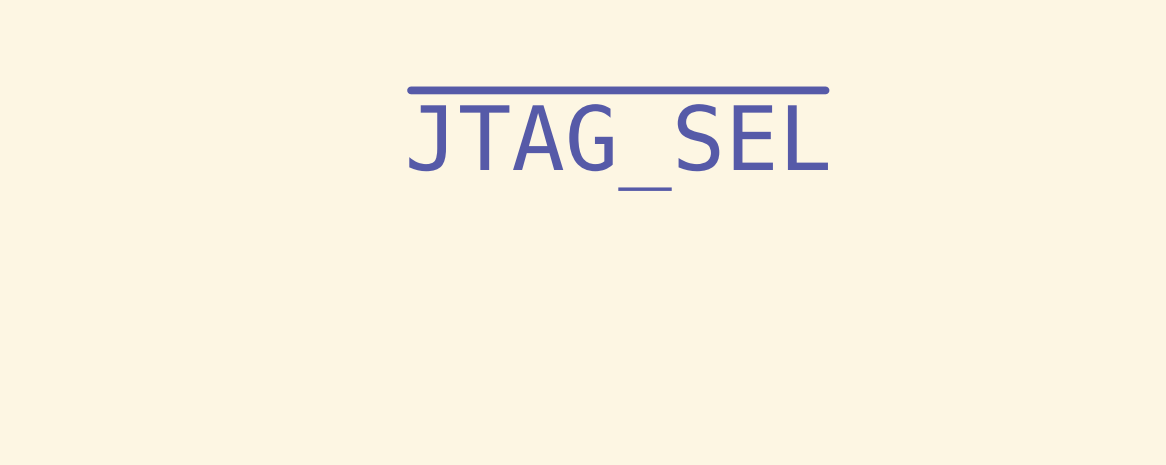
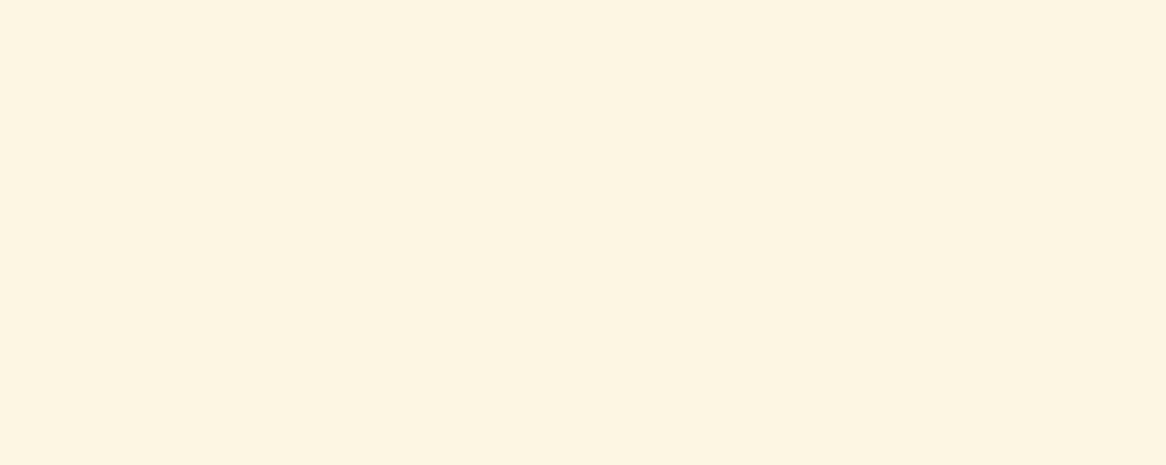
text: ~{JTAG_SEL} (618, 140) -> none

